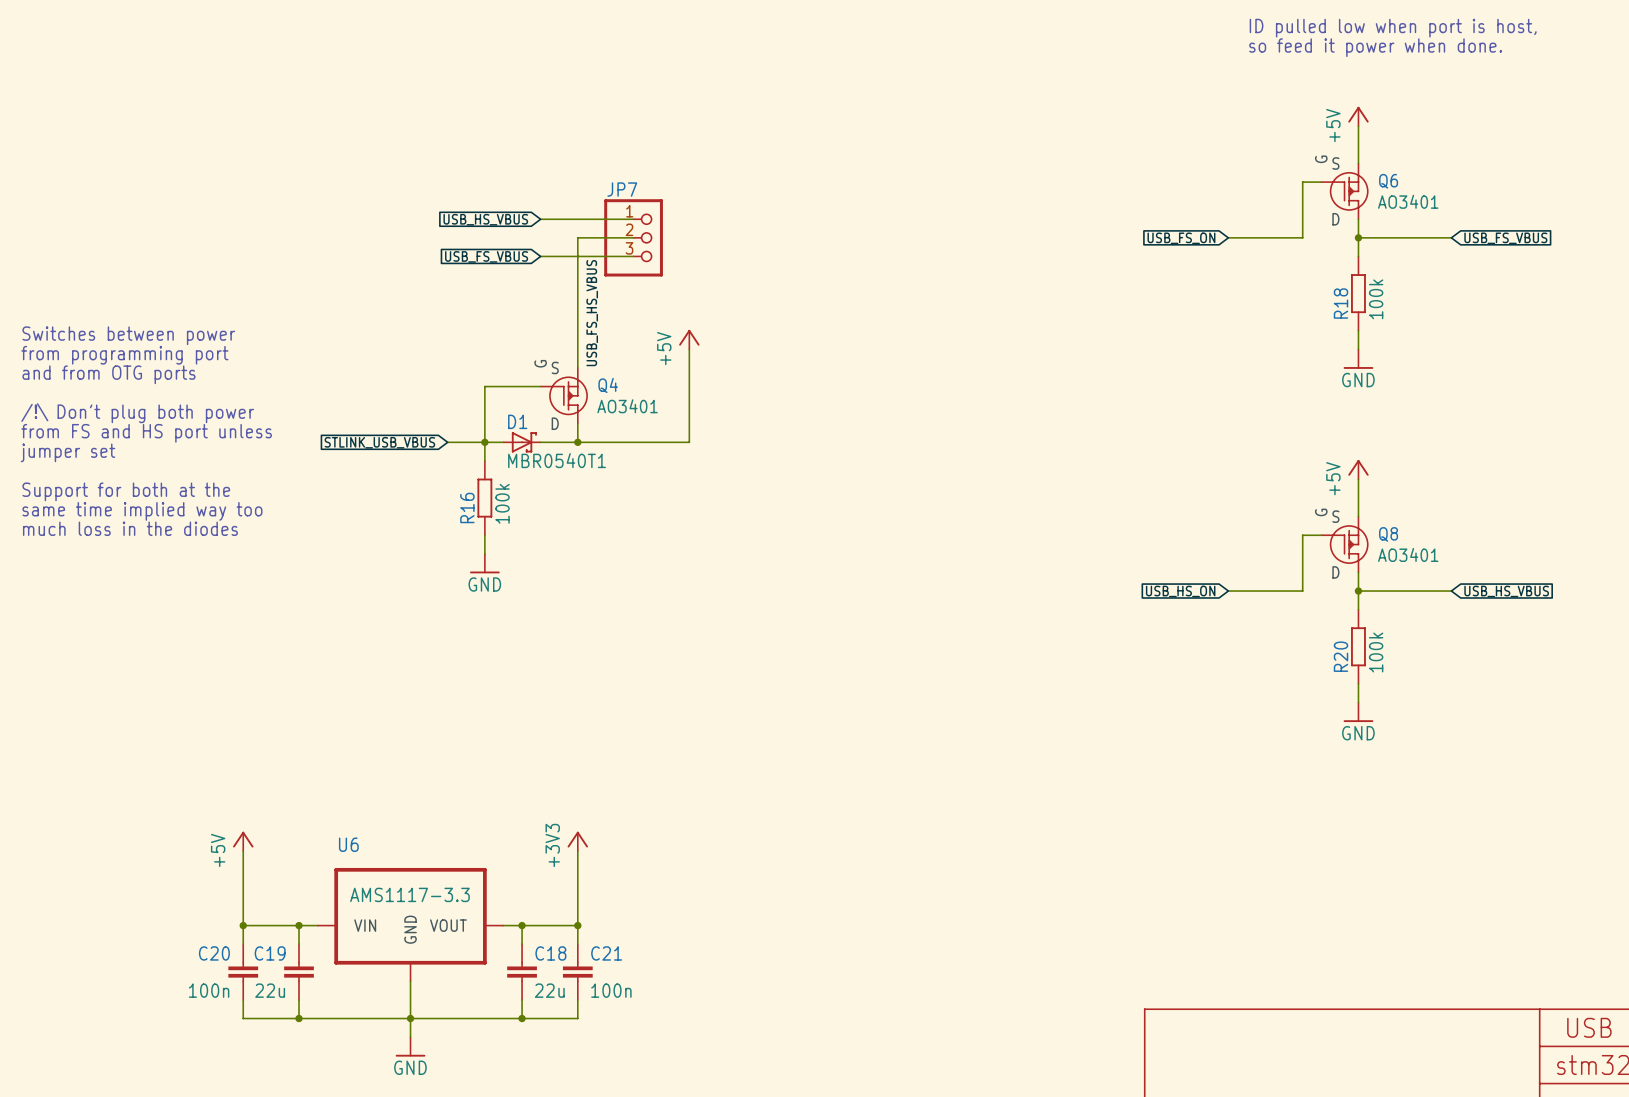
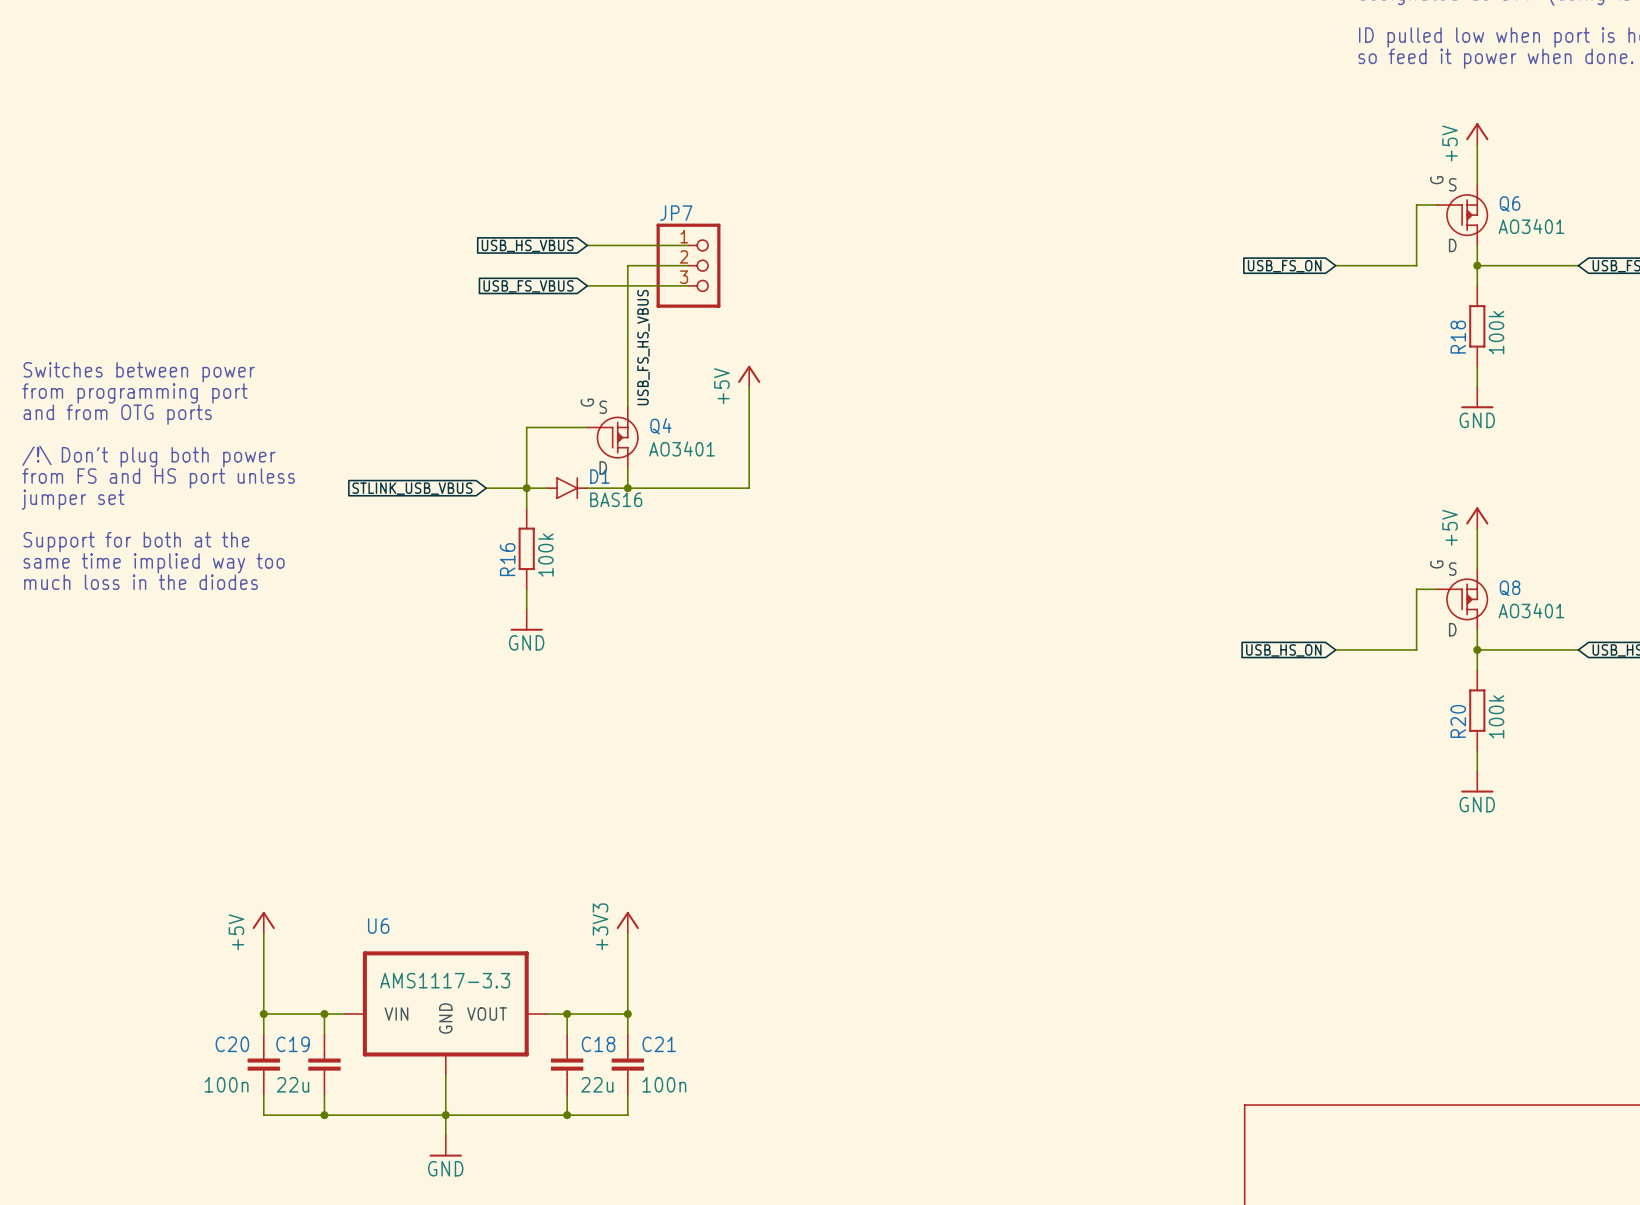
D1 name position: D1 (517, 421) -> D1 (599, 476)
D1 symbol: [503, 432, 541, 453] -> [546, 477, 588, 499]
D1 value: MBR0540T1 (557, 460) -> BAS16 (616, 499)

